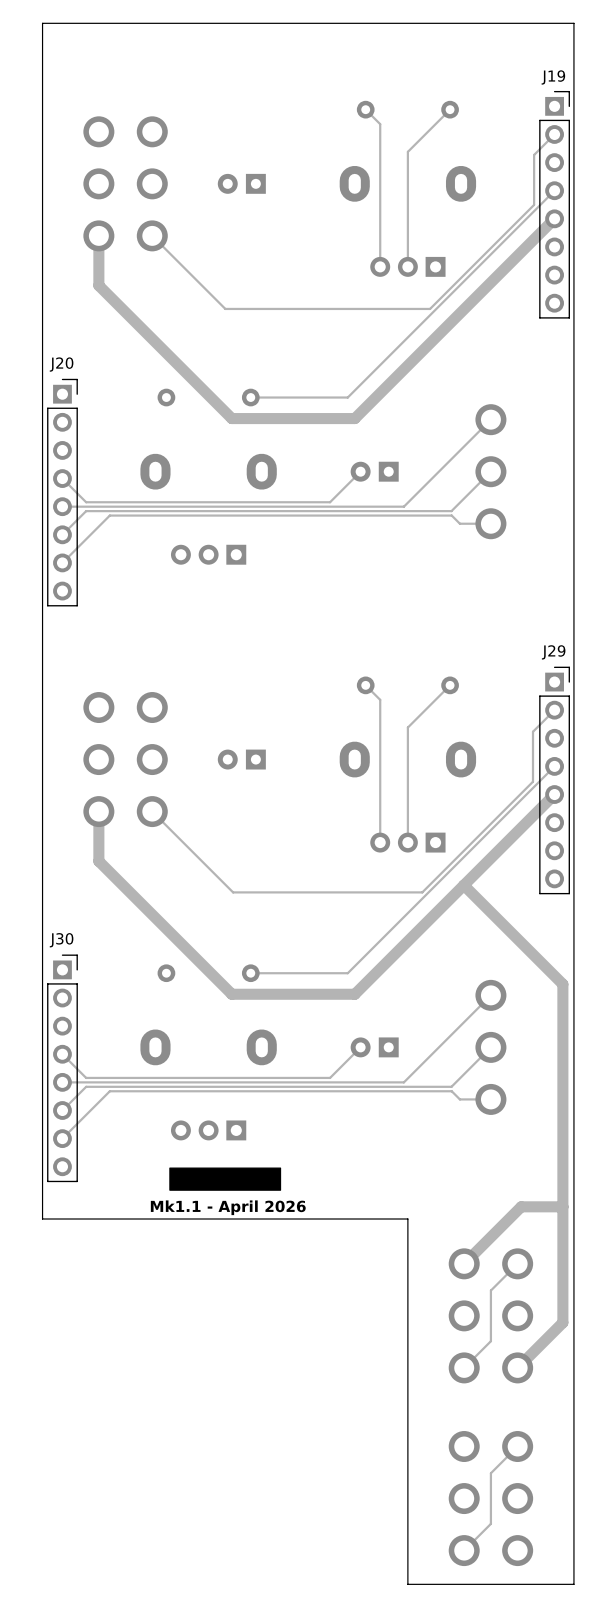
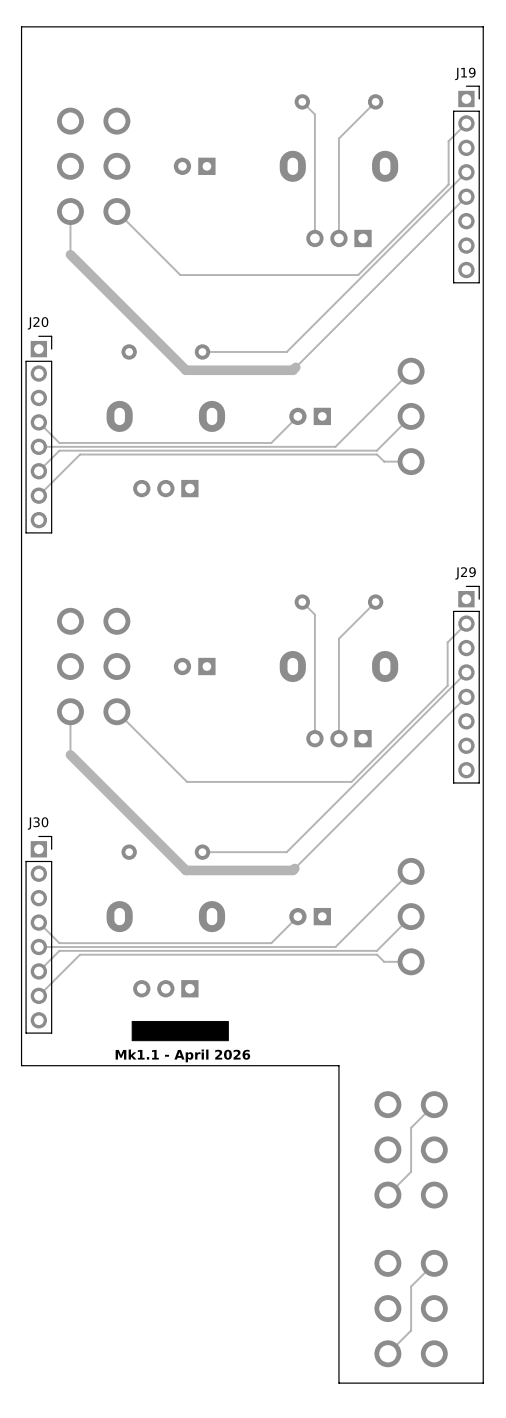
track width: thick (554, 218) (358, 415) -> thin (466, 196) (295, 367)
track width: thick (98, 235) (98, 285) -> thin (70, 211) (70, 254)
track width: thick (554, 794) (357, 992) -> thin (466, 696) (294, 868)
track width: thick (98, 811) (98, 861) -> thin (70, 711) (70, 754)
track: (463, 885) (562, 984) (562, 1322) (517, 1367) -> none
track: (562, 1206) (521, 1206) (464, 1263) -> none

